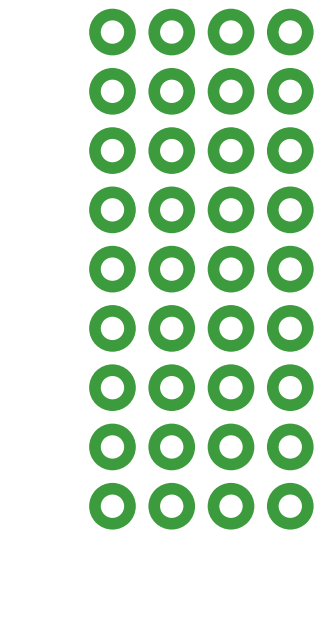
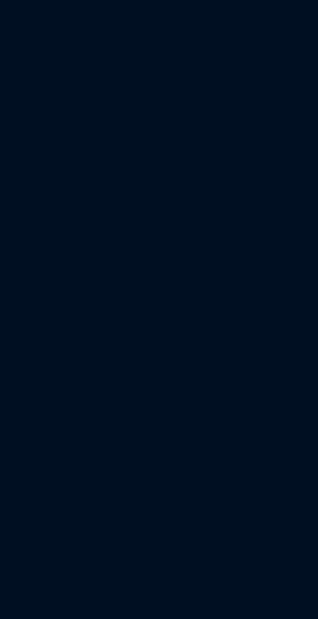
part: (112, 32) -> none
part: (171, 32) -> none
part: (231, 32) -> none
part: (290, 32) -> none
part: (112, 91) -> none
part: (171, 91) -> none
part: (231, 91) -> none
part: (290, 91) -> none
part: (112, 150) -> none
part: (171, 150) -> none
part: (231, 150) -> none
part: (290, 150) -> none
part: (112, 209) -> none
part: (171, 209) -> none
part: (231, 209) -> none
part: (290, 209) -> none
part: (112, 269) -> none
part: (171, 269) -> none
part: (231, 269) -> none
part: (290, 269) -> none
part: (112, 328) -> none
part: (171, 328) -> none
part: (231, 328) -> none
part: (290, 328) -> none
part: (112, 387) -> none
part: (171, 387) -> none
part: (231, 387) -> none
part: (290, 387) -> none
part: (112, 446) -> none
part: (171, 446) -> none
part: (231, 446) -> none
part: (290, 446) -> none
part: (112, 506) -> none
part: (171, 506) -> none
part: (231, 506) -> none
part: (290, 506) -> none

